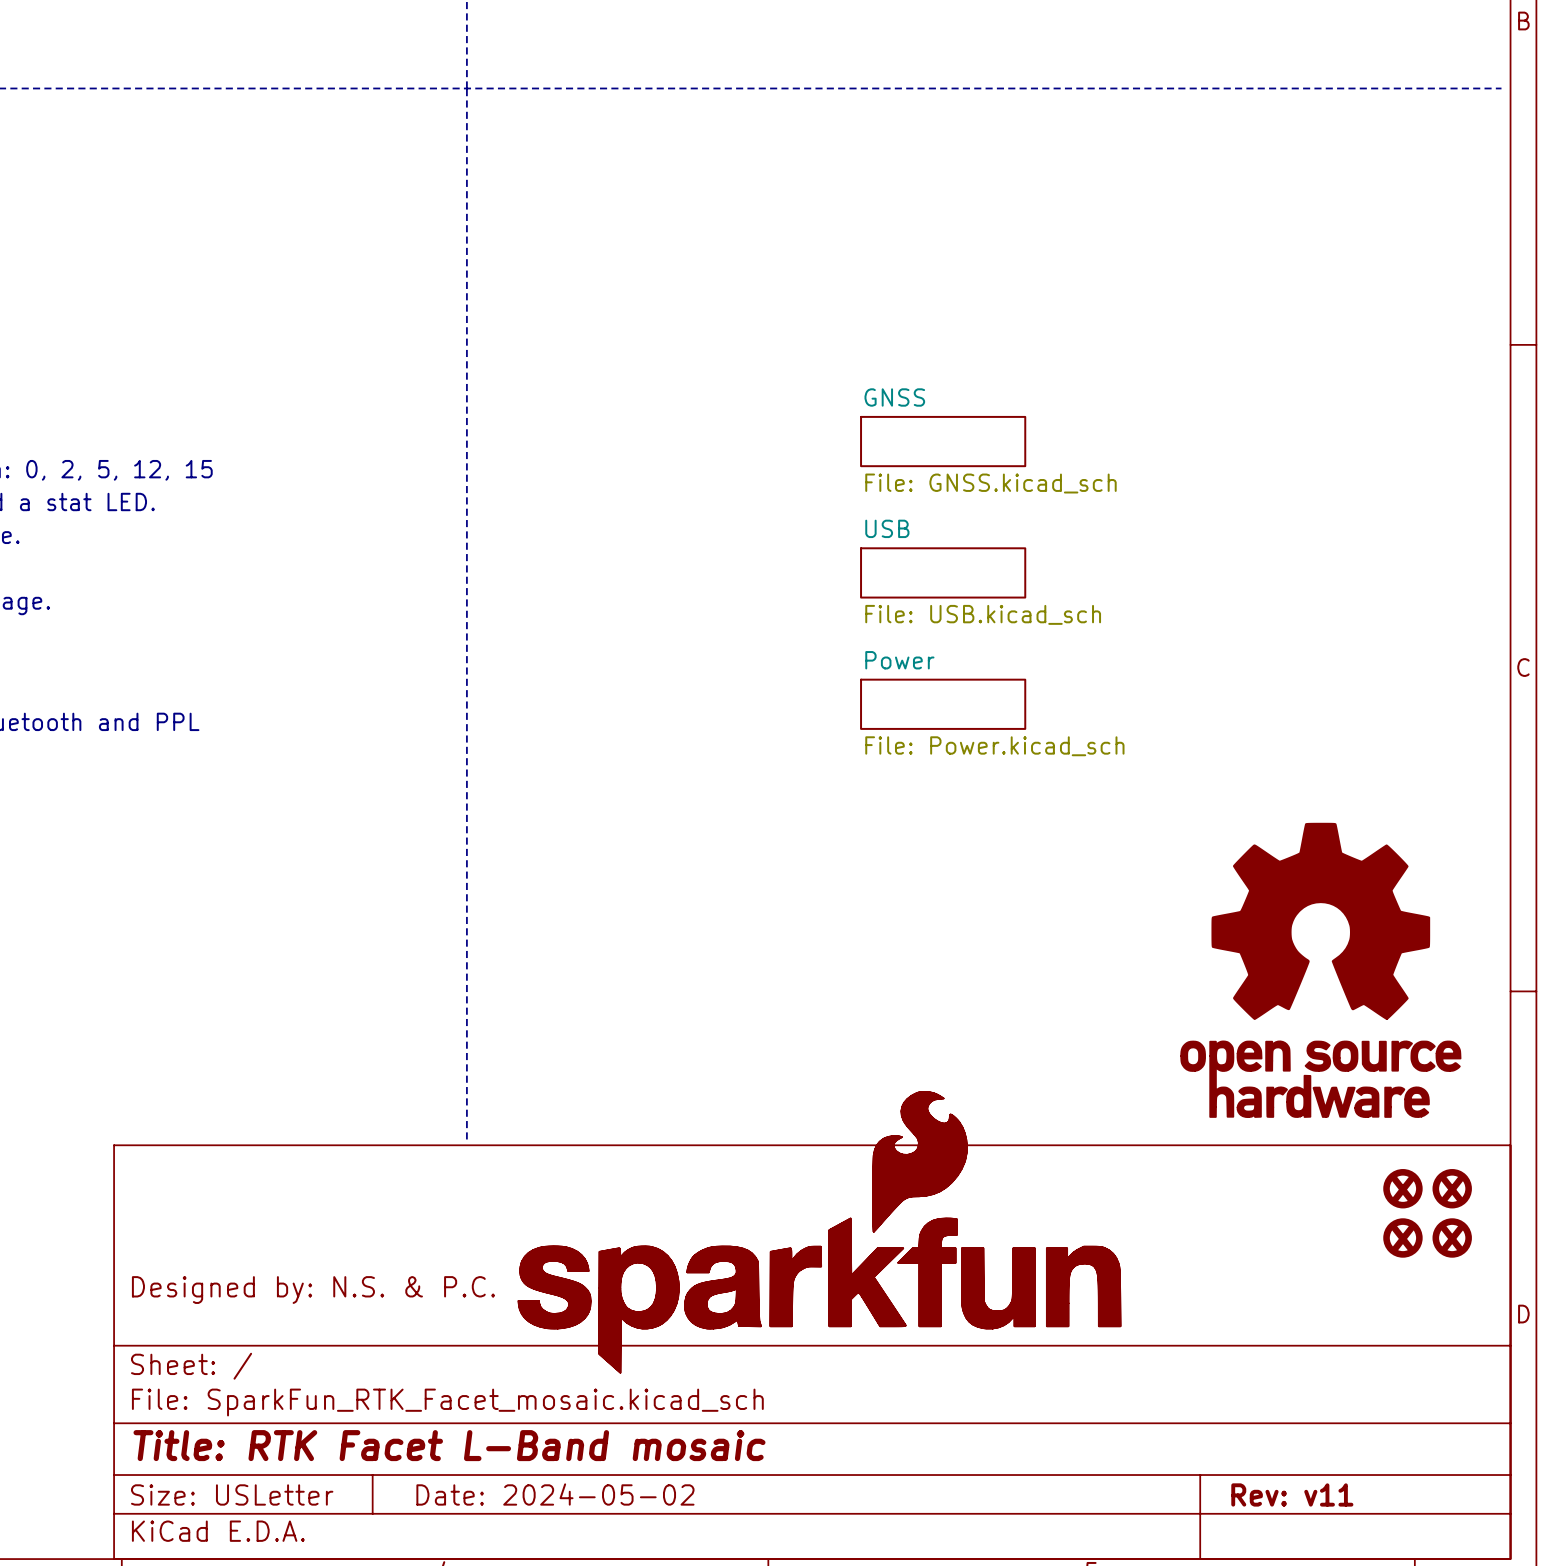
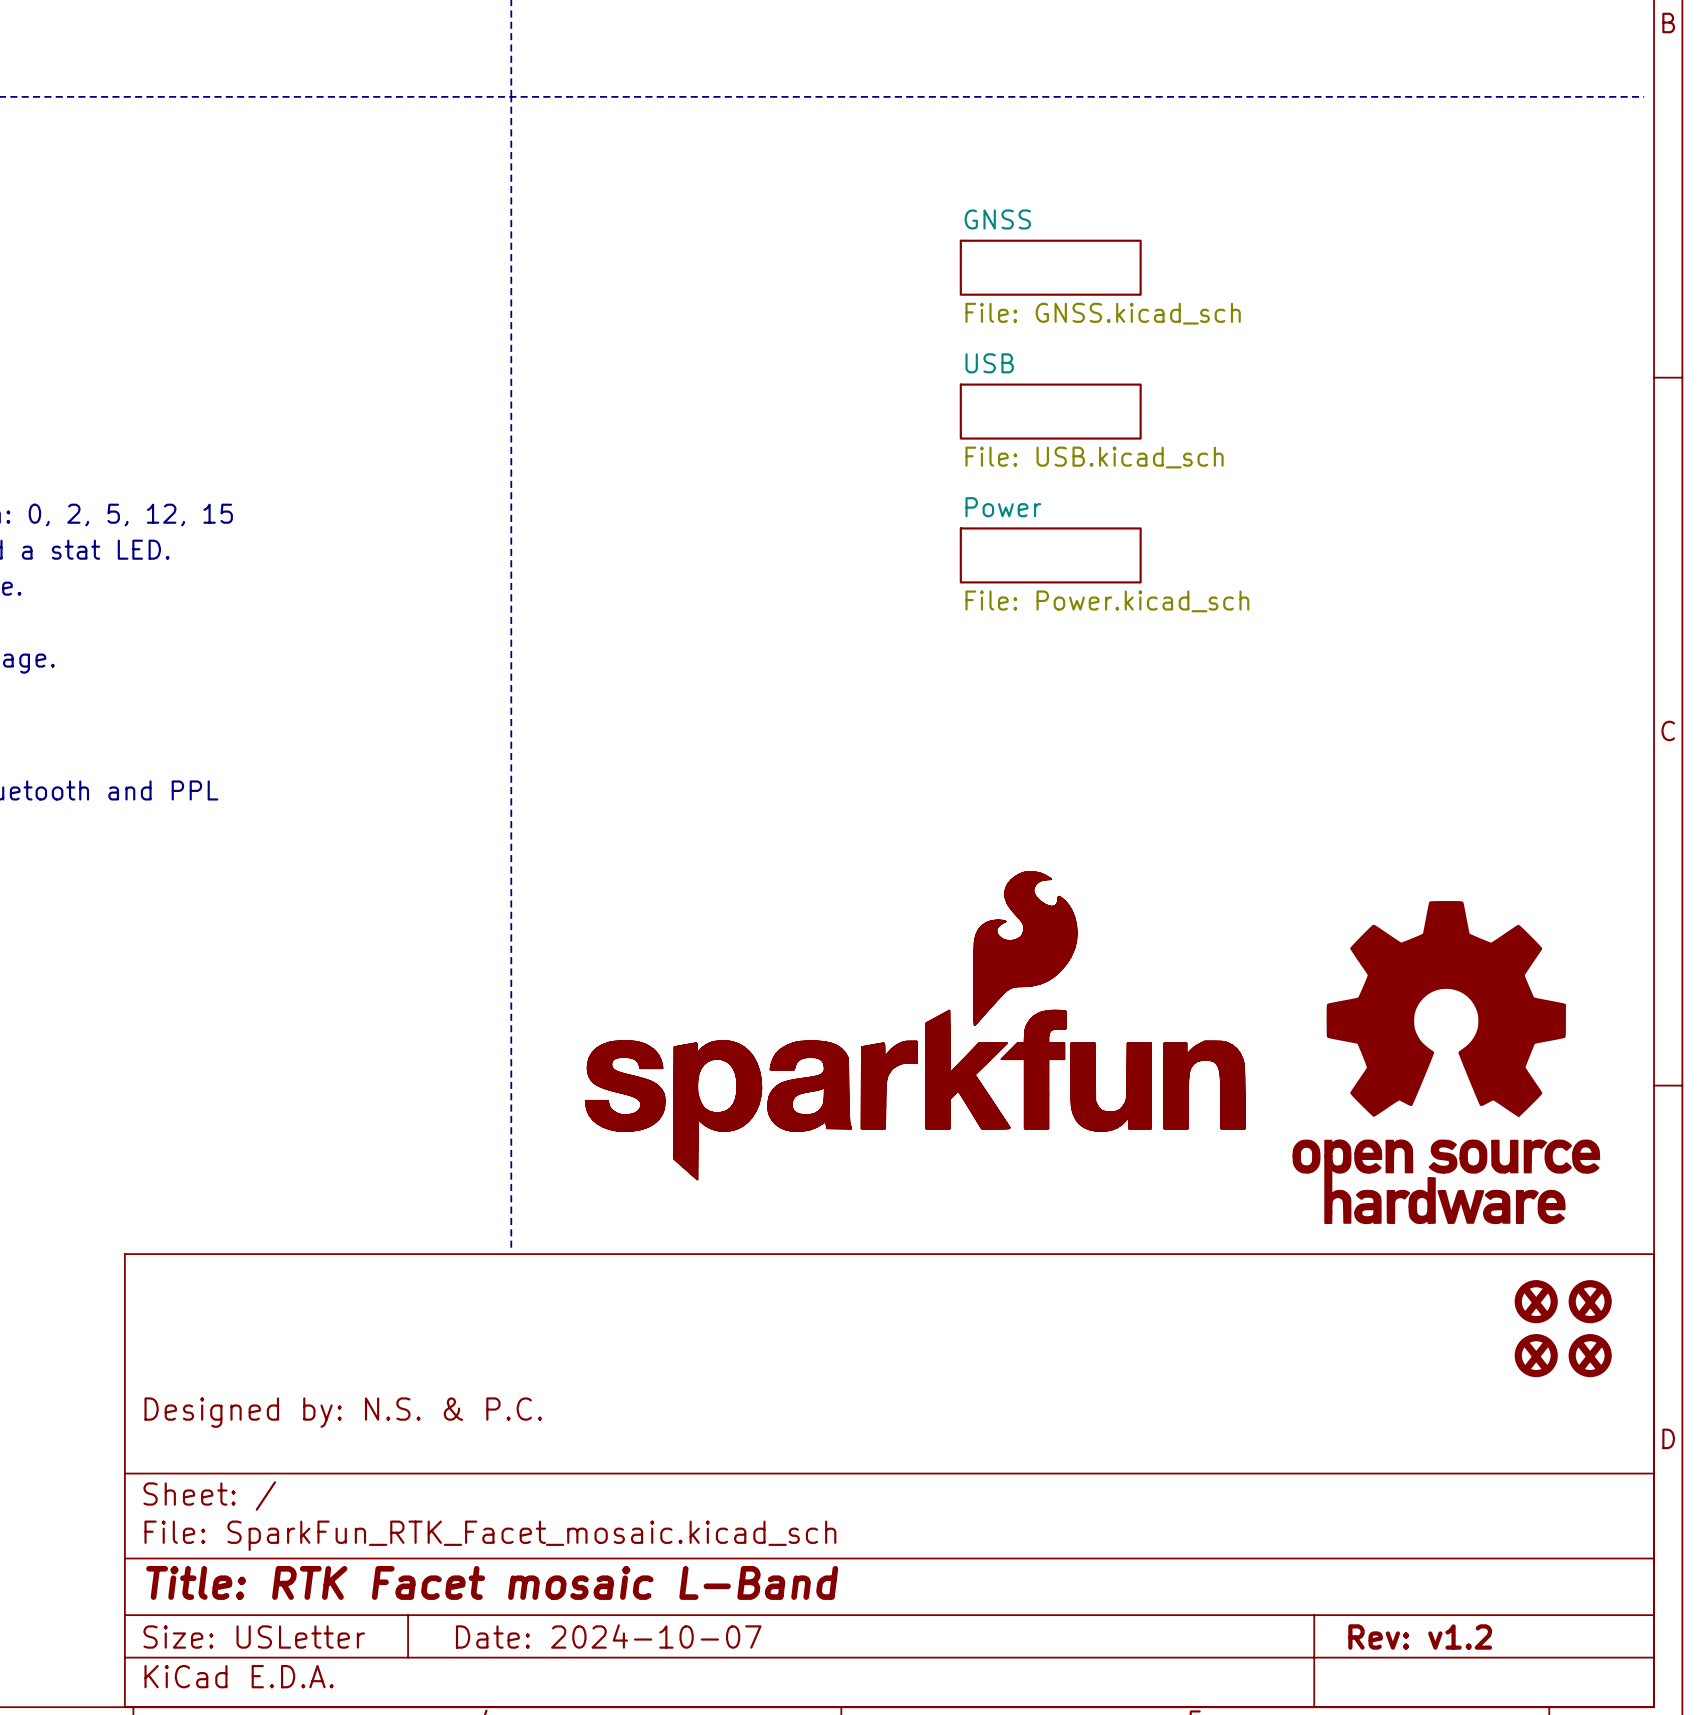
sheet GNSS position: (943, 441) -> (1050, 267)
sheet USB position: (943, 572) -> (1050, 411)
sheet Power position: (943, 704) -> (1050, 555)
part position: (819, 1232) -> (915, 1025)
title block: Title: RTK Facet L-Band mosaic (449, 1445) -> Title: RTK Facet mosaic L-Band (492, 1582)
title block: Date: 2024-05-02 (555, 1494) -> Date: 2024-10-07 (608, 1636)
title block: Rev: v11 (1292, 1494) -> Rev: v1.2 (1420, 1637)

